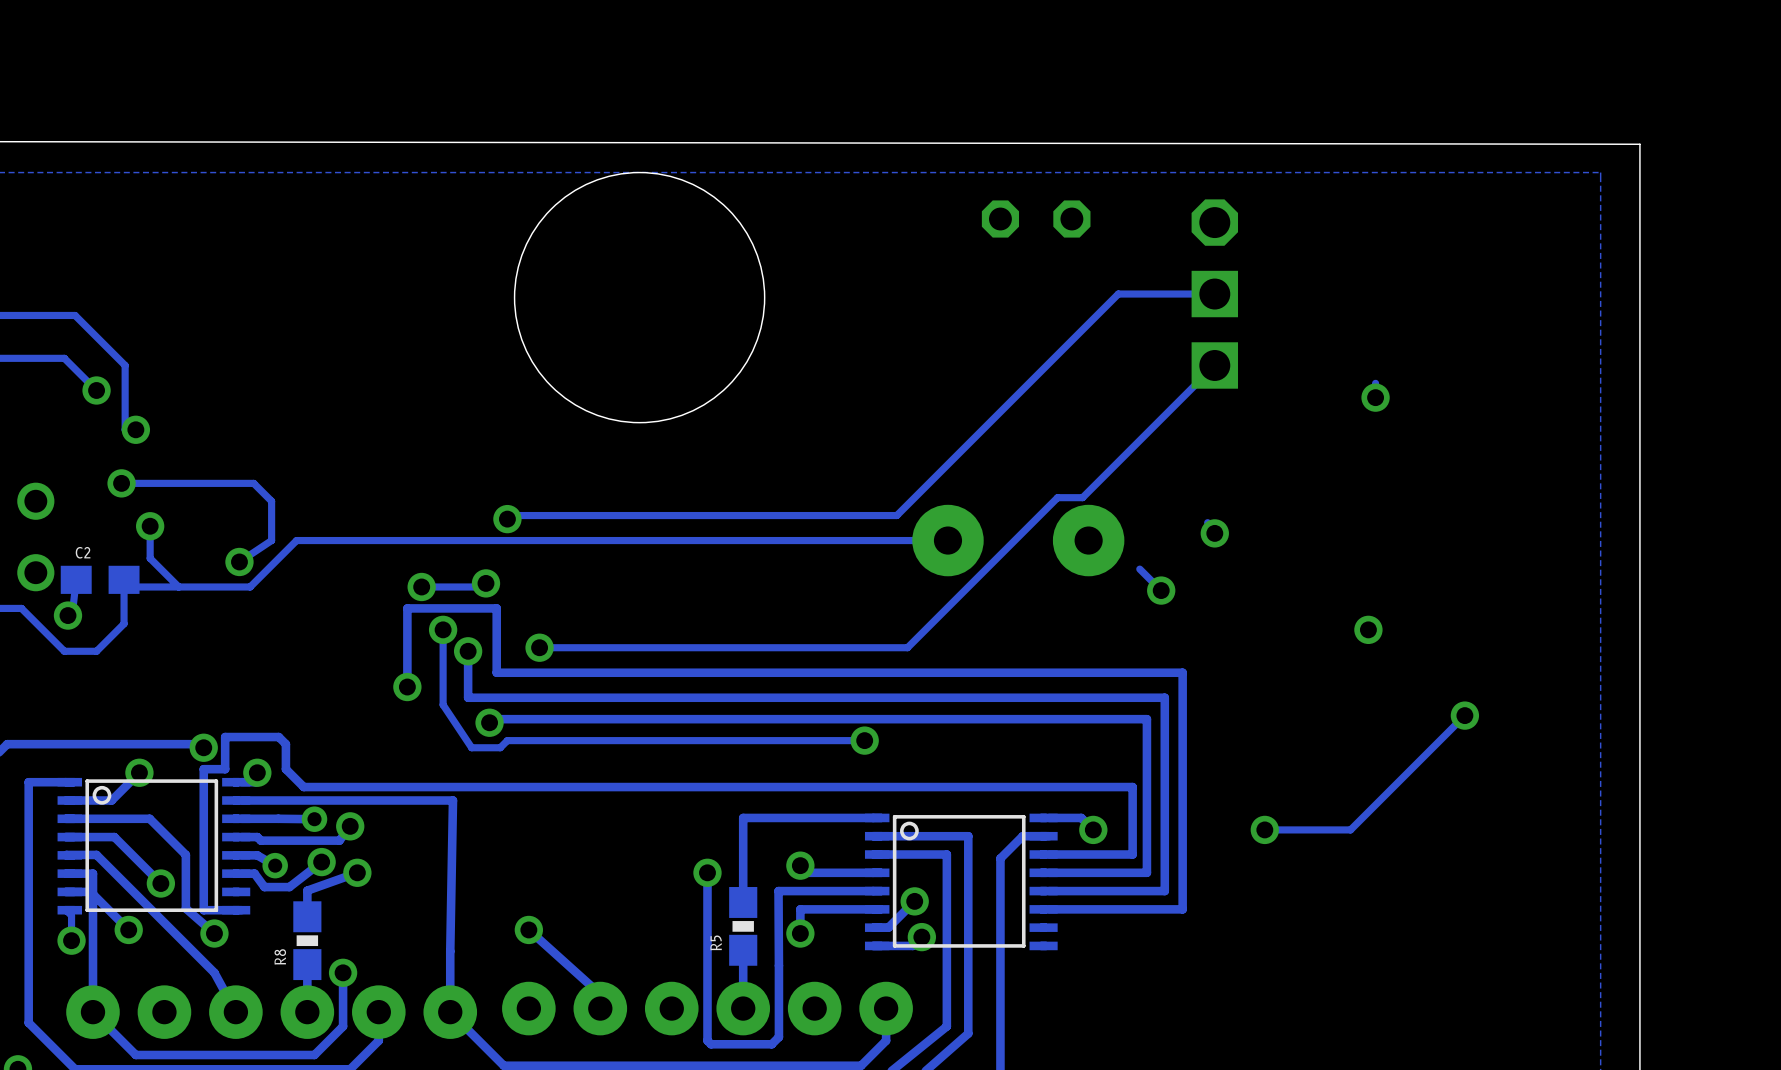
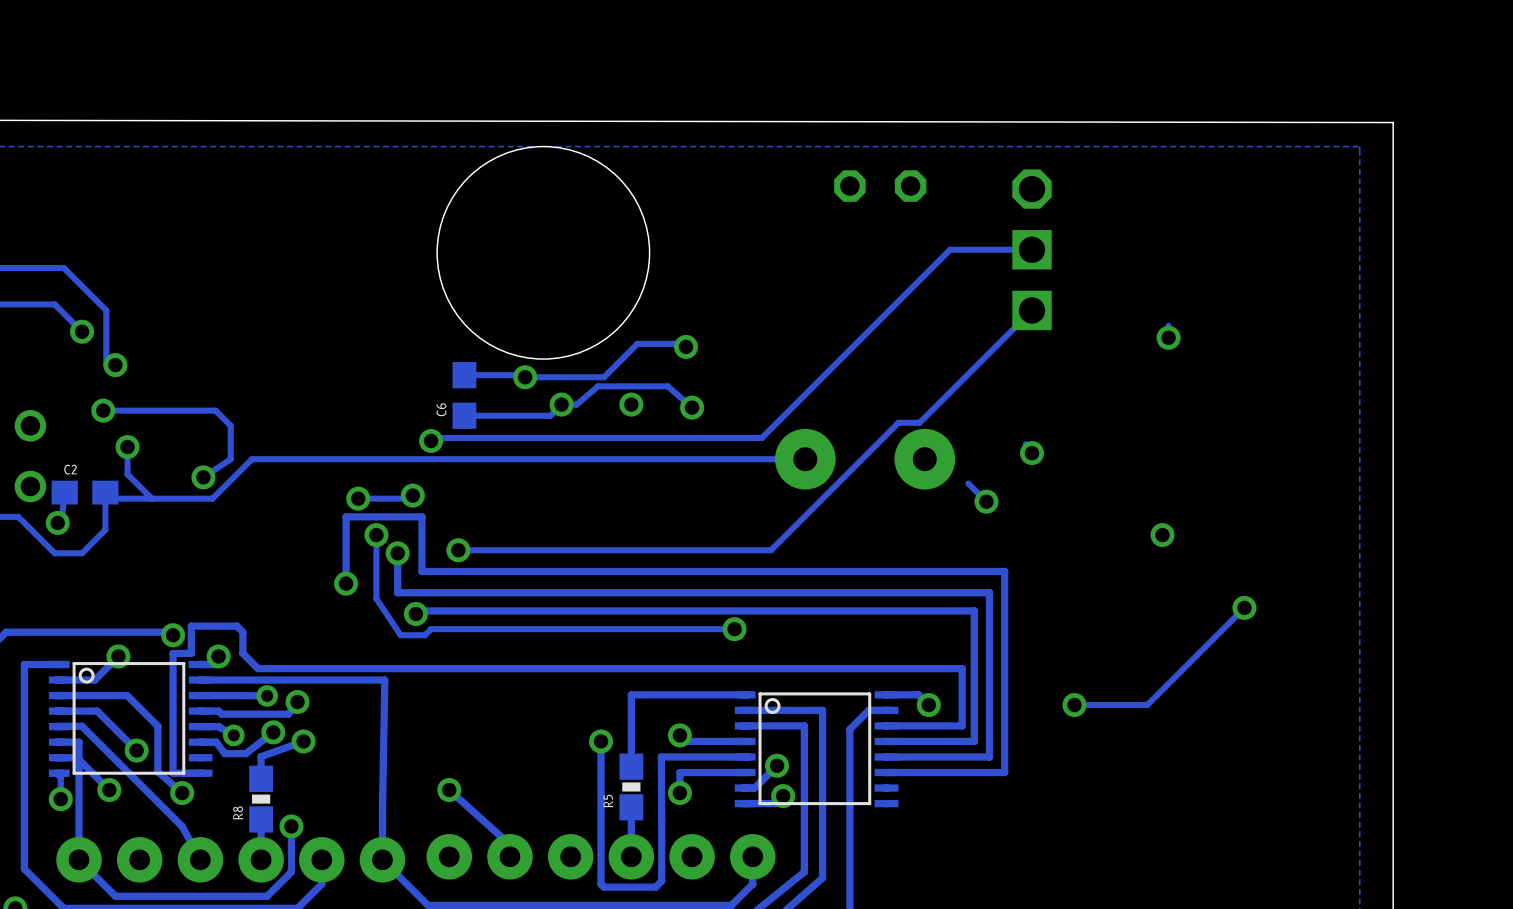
track: none -> (686, 346) (682, 343) (637, 343) (604, 377) (464, 375)
via: none -> (686, 346)
via: none -> (525, 377)
C6: none -> (464, 395)
via: none -> (561, 404)
via: none -> (631, 404)
track: none -> (692, 407) (667, 386) (597, 386) (576, 404) (561, 404) (550, 415) (464, 415)
via: none -> (692, 407)

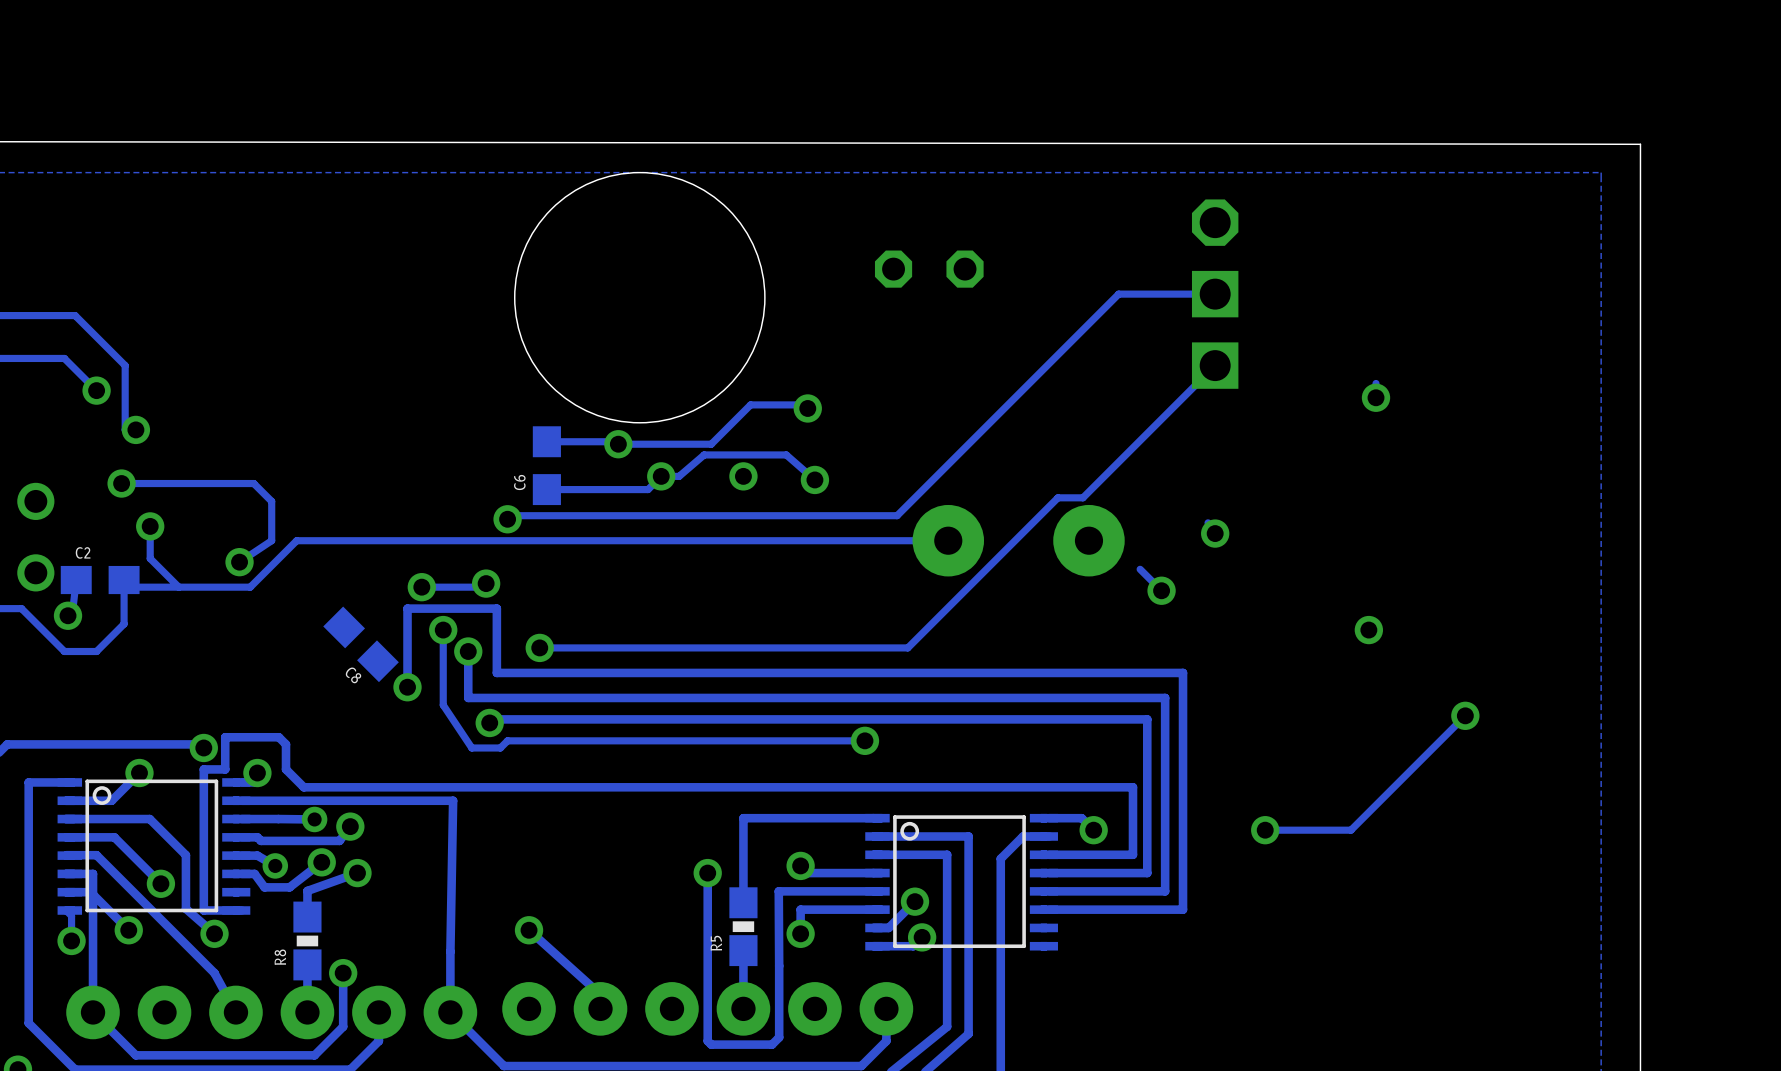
part position: (880, 186) -> (929, 269)
C8: none -> (361, 644)

